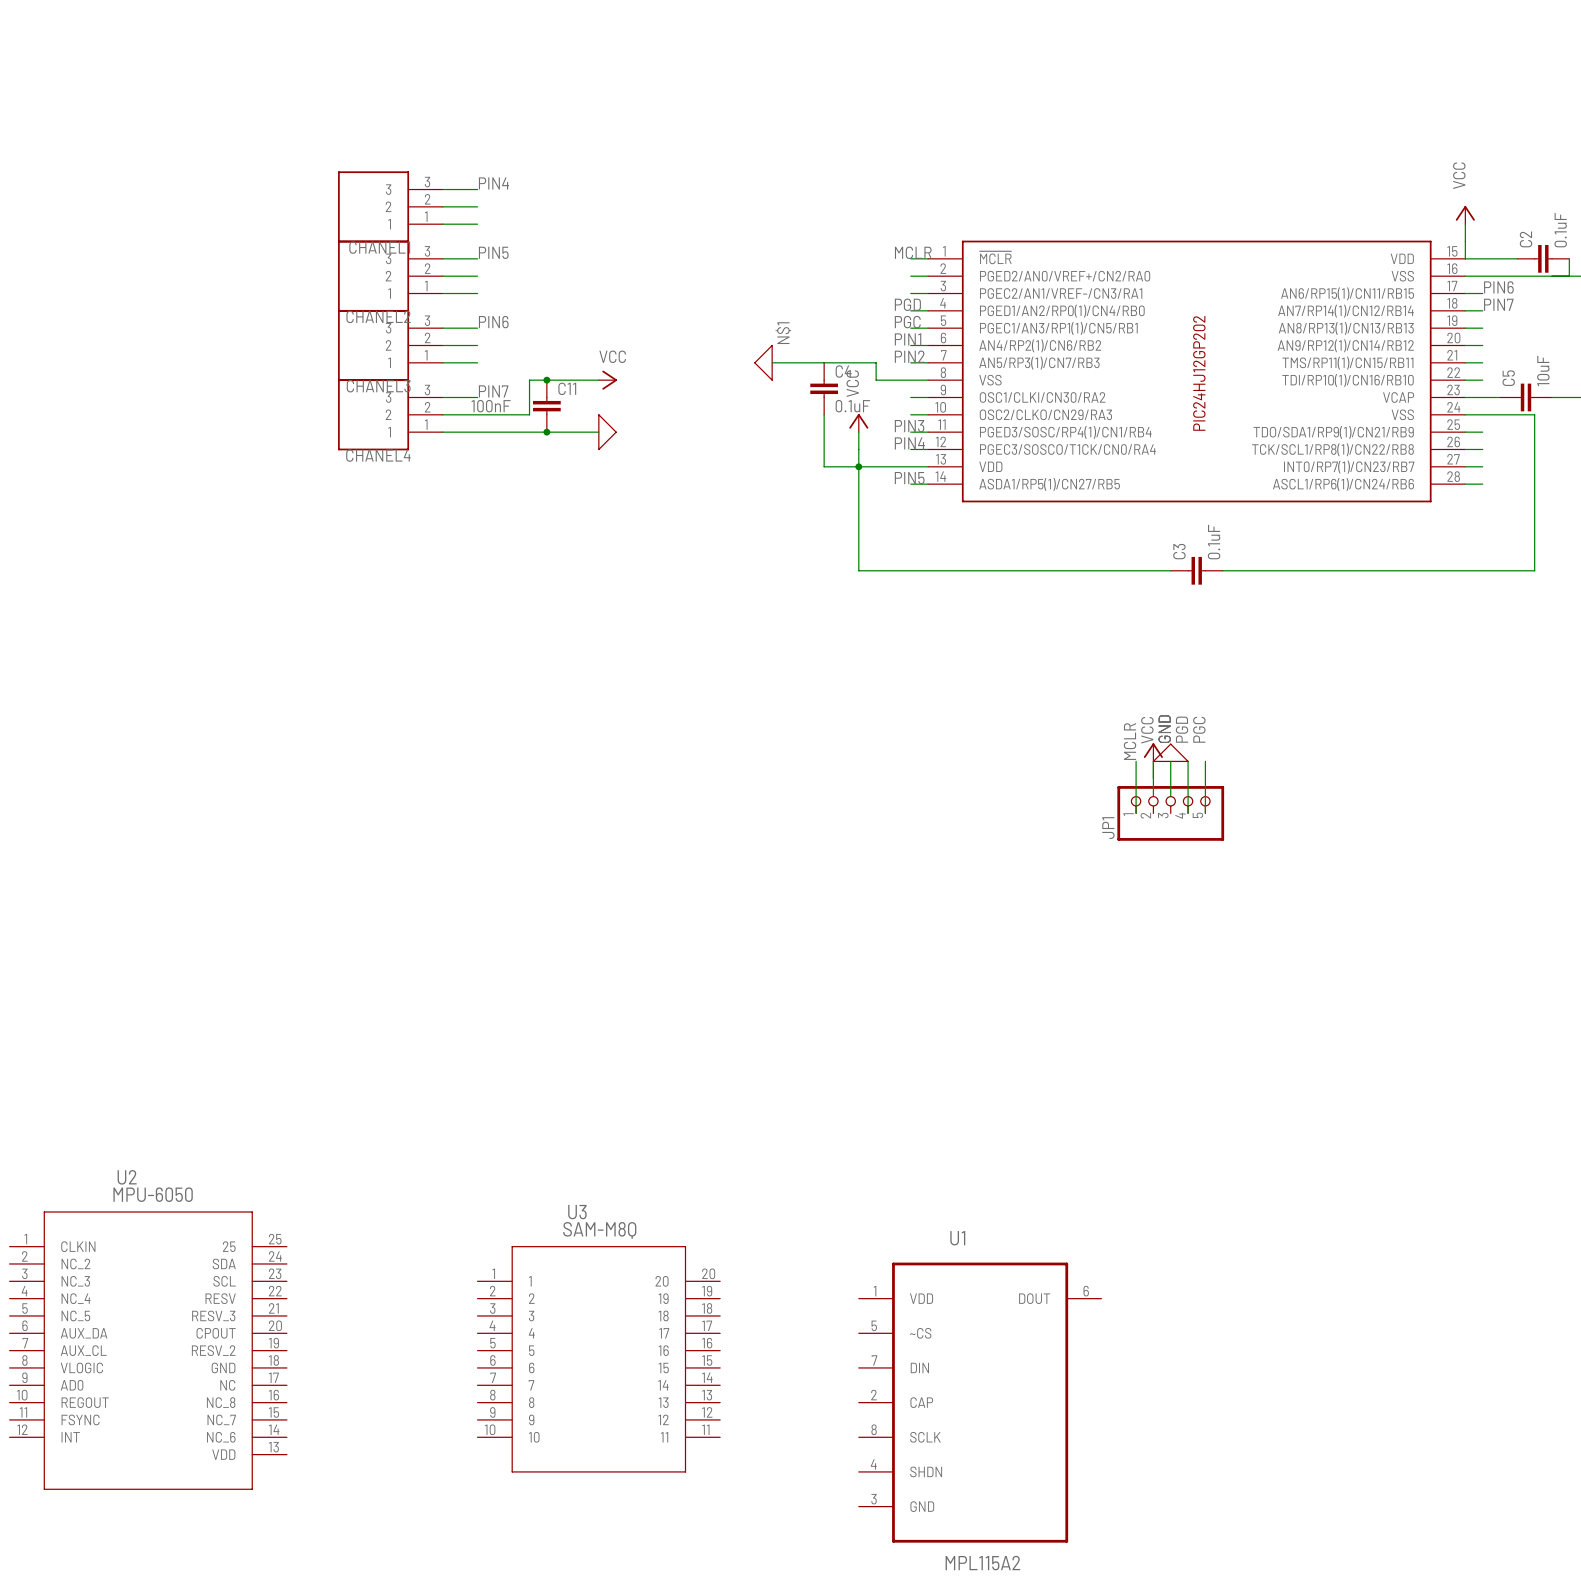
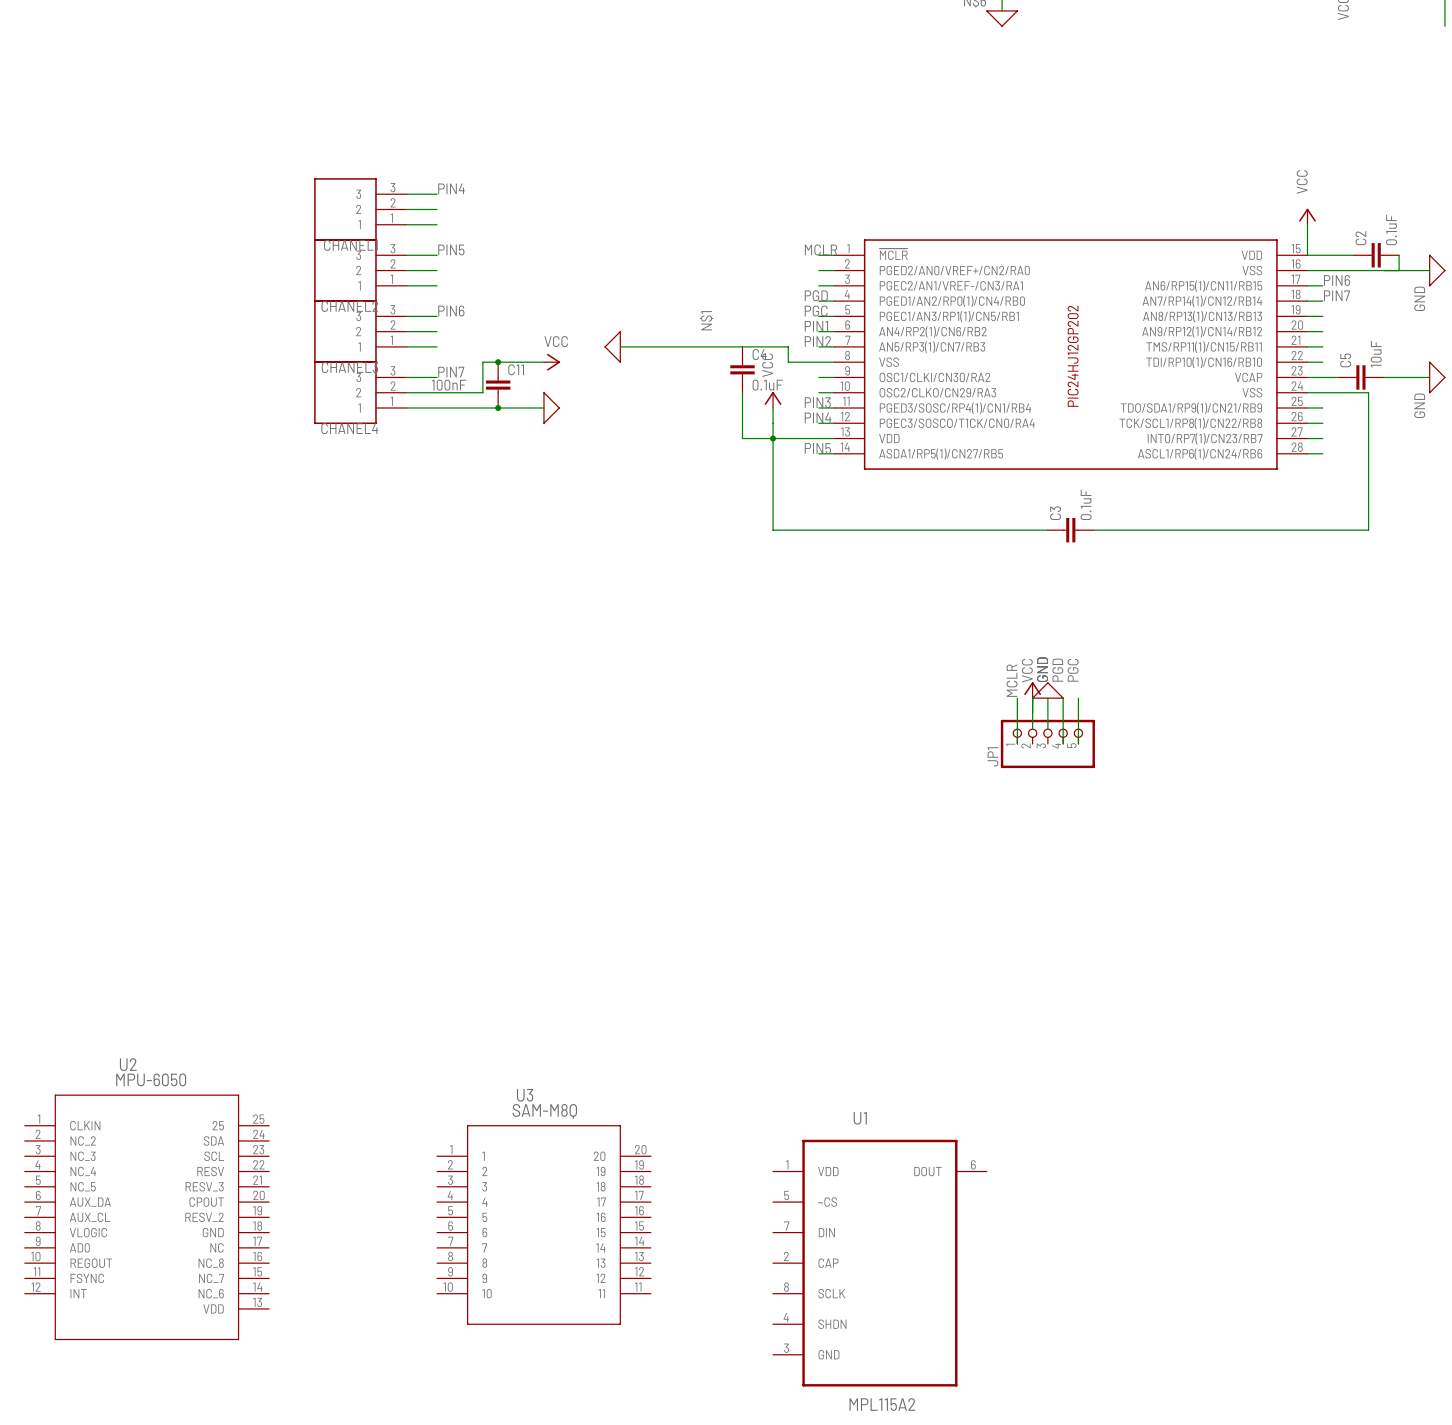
wire: none -> (620, 346) (696, 346)
power symbol position: (763, 362) -> (612, 346)

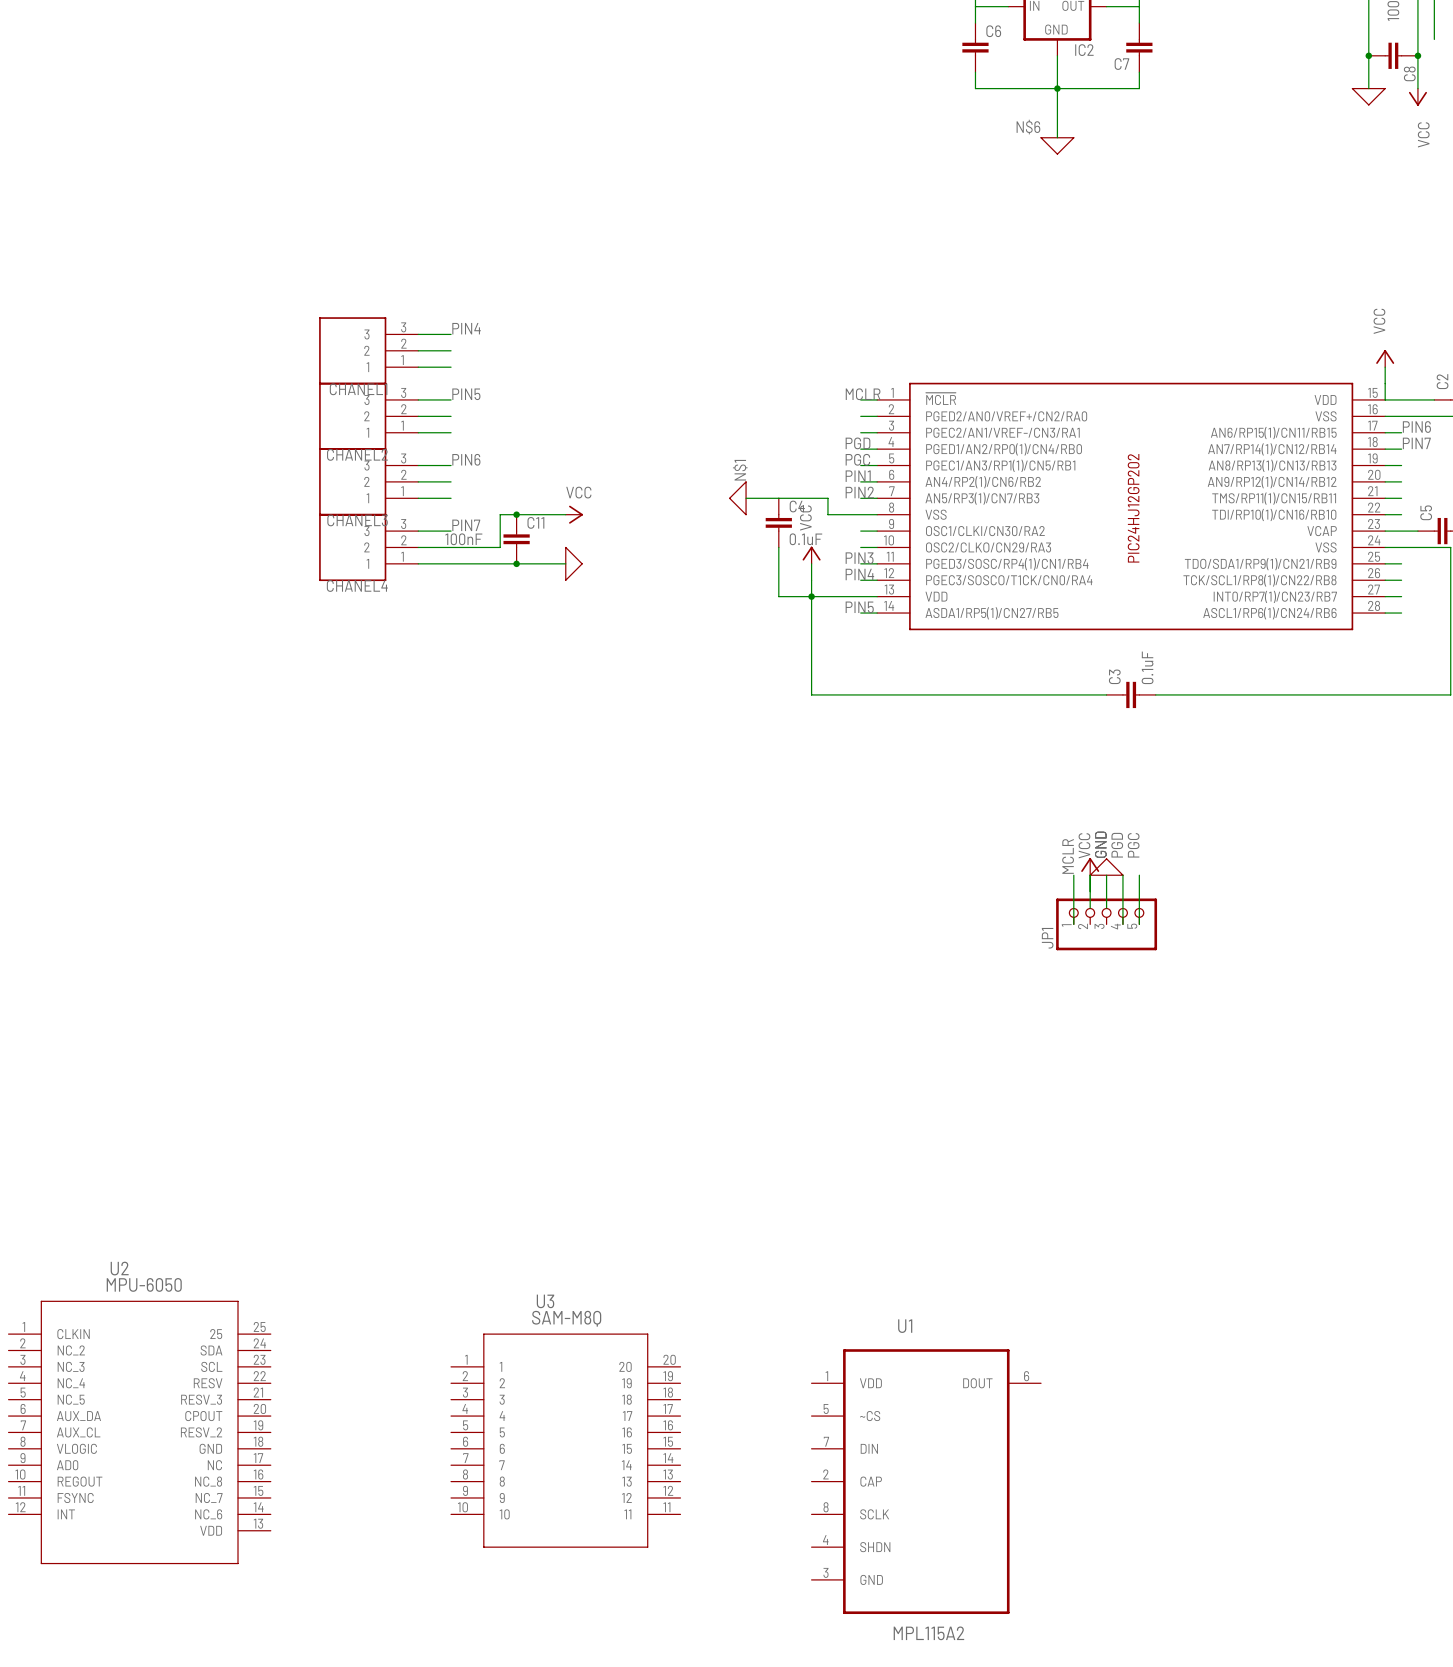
power symbol position: (612, 346) -> (737, 498)
wire: (620, 346) (711, 346) -> none

